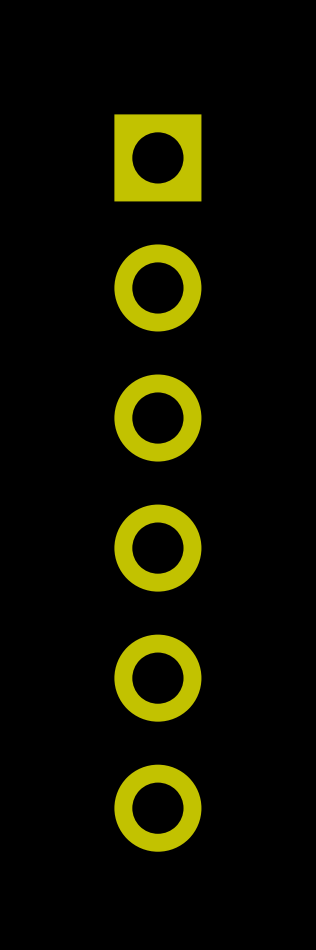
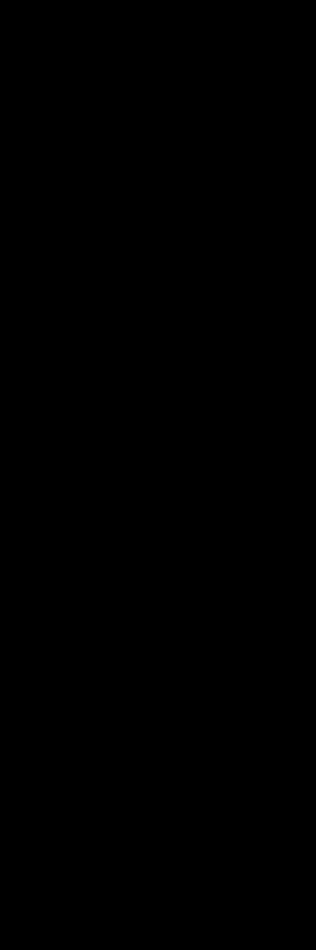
part: (157, 483) -> none

